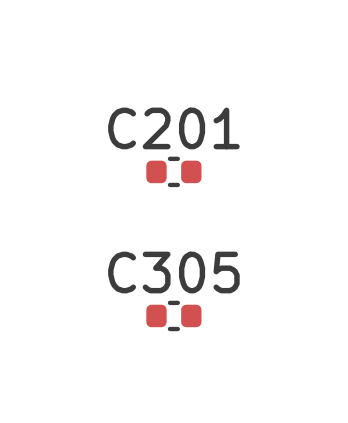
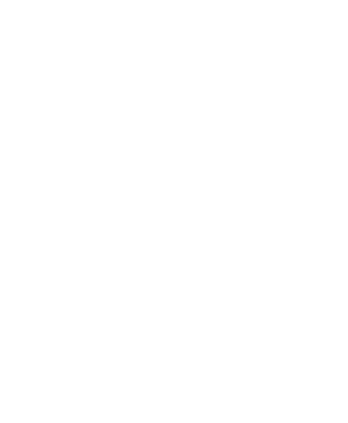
C201: (173, 171) -> none
C305: (173, 315) -> none

